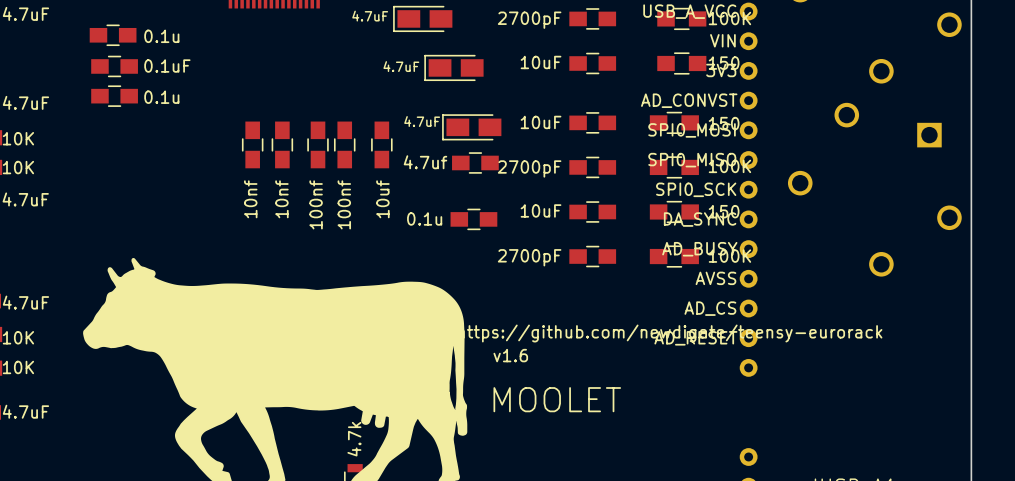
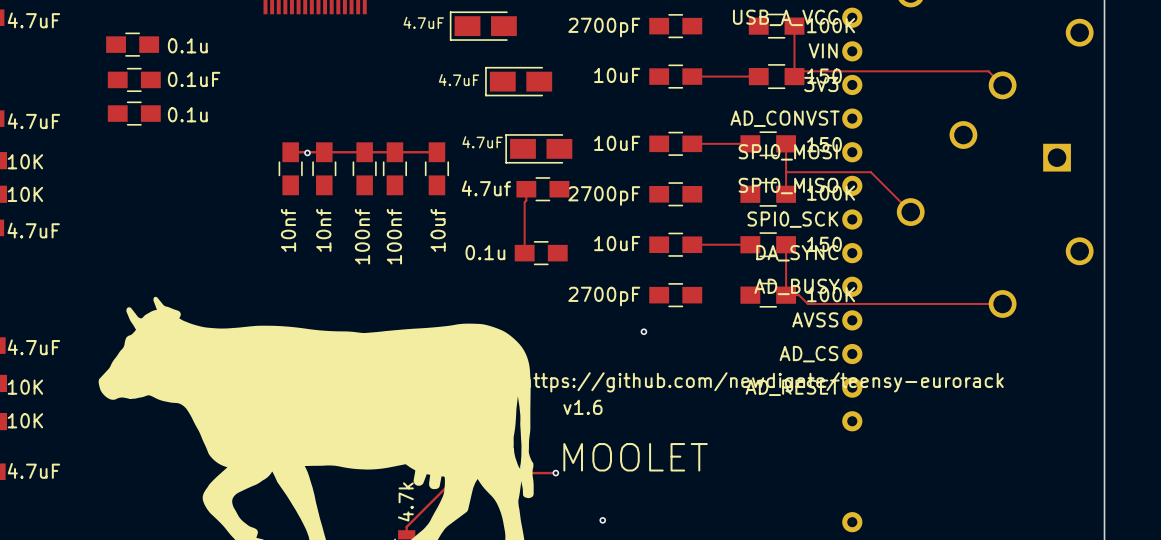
track: none -> (794, 26) (794, 76)
track: none -> (794, 71) (988, 71) (1002, 85)
track: none -> (692, 76) (758, 76)
track: none -> (692, 143) (750, 143)
track: none -> (786, 143) (786, 194)
track: none -> (290, 152) (436, 152)
via: none -> (307, 152)
track: none -> (786, 172) (870, 172) (910, 212)
track: none -> (526, 189) (524, 253)
track: none -> (692, 244) (750, 244)
track: none -> (786, 244) (786, 295) (799, 295) (807, 303) (1002, 303)
via: none -> (643, 331)
track: none -> (555, 473) (460, 473) (406, 526) (406, 534)
via: none -> (555, 473)
via: none -> (602, 520)

